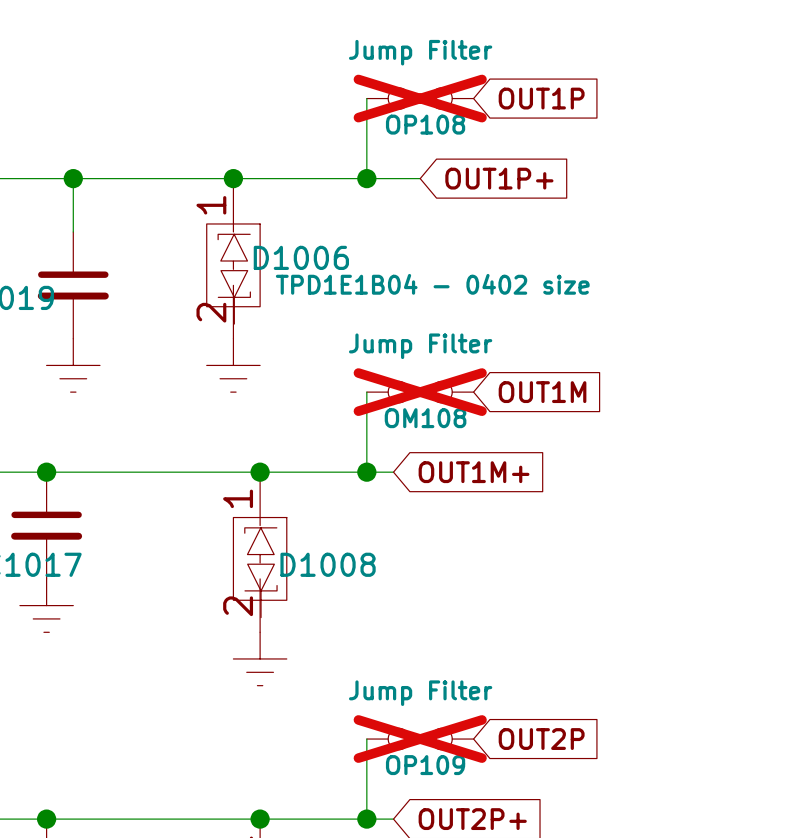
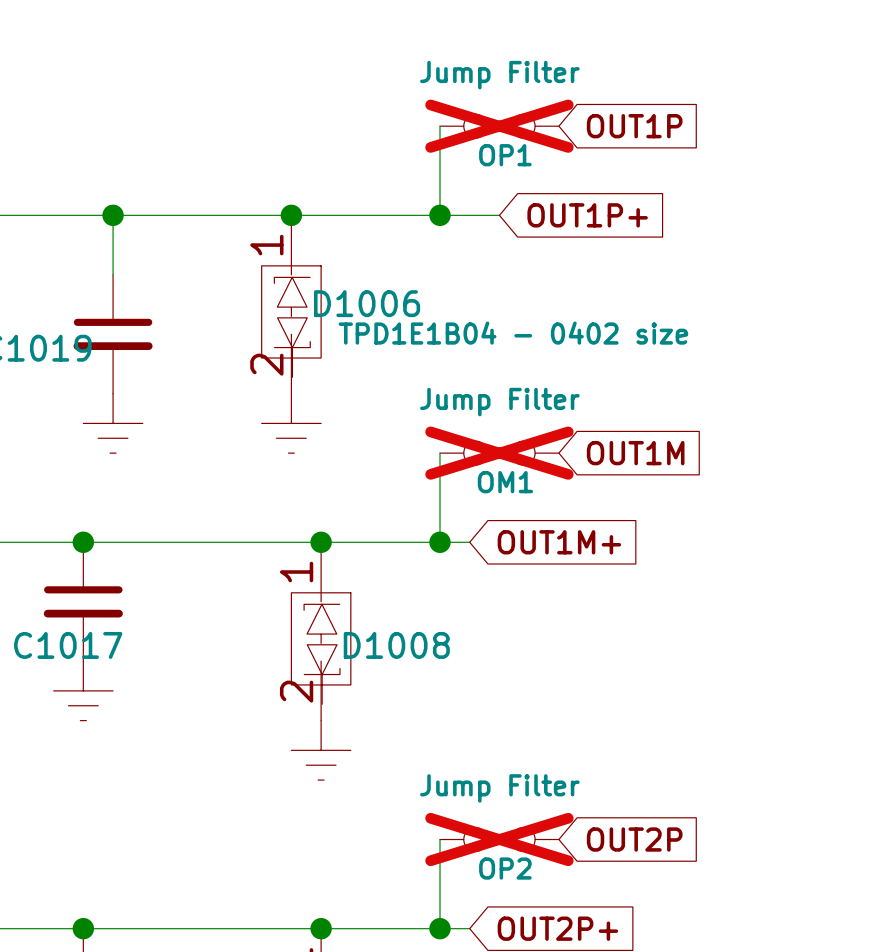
OP108 name: OP108 (425, 124) -> OP1 (505, 155)
OM108 name: OM108 (425, 418) -> OM1 (505, 482)
OP109 name: OP109 (425, 765) -> OP2 (505, 868)

